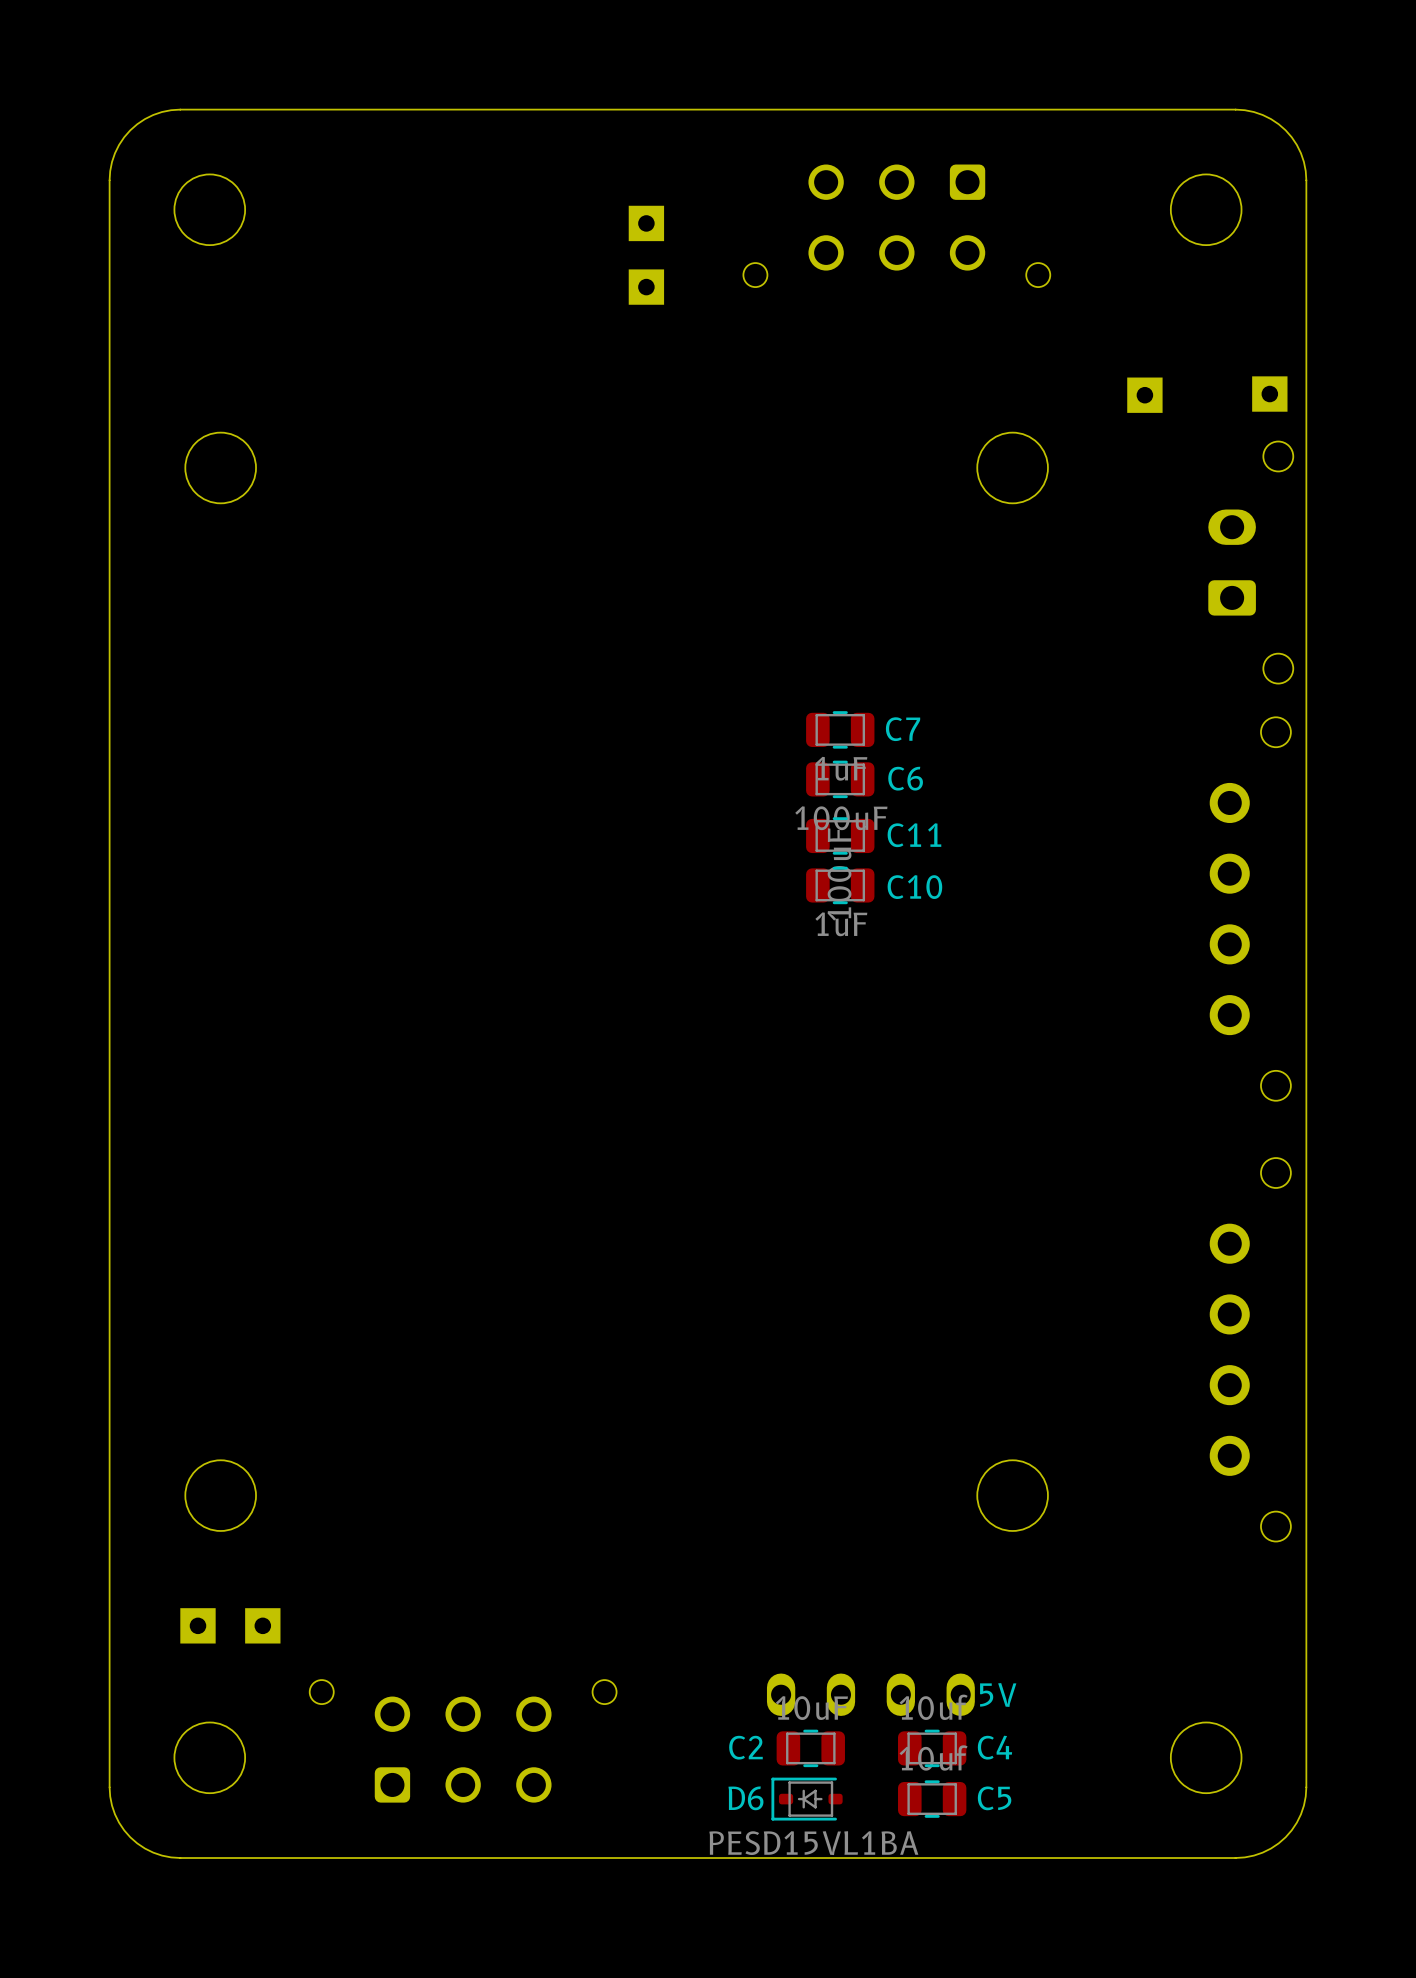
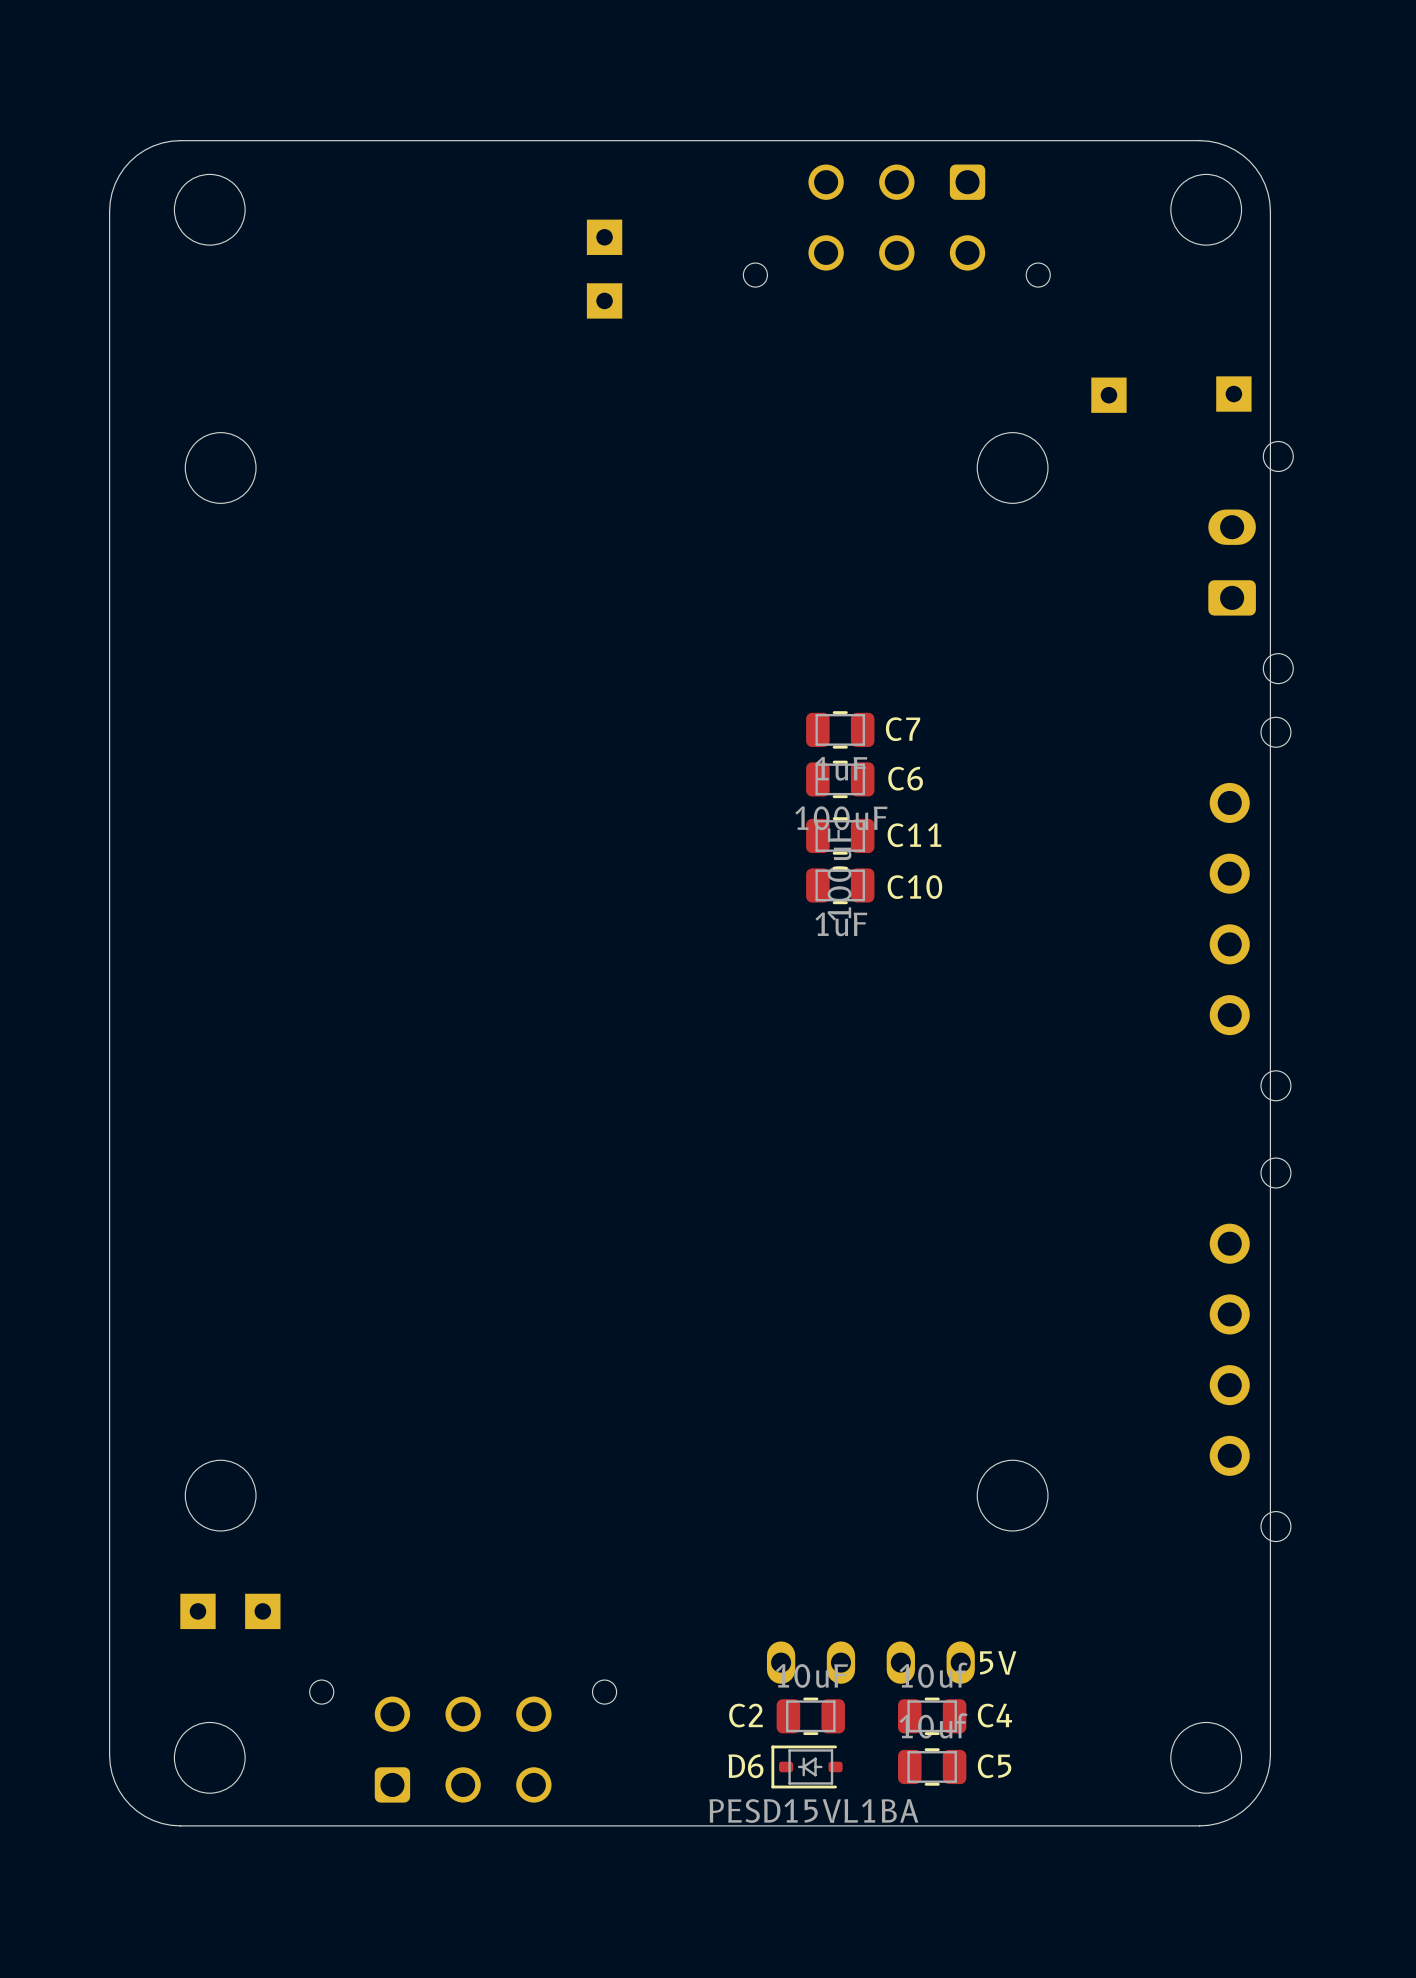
board edge: (109, 211) (110, 171) (114, 153) (124, 137) (137, 124) (153, 114) (180, 109) (1235, 109) (1262, 114) (1278, 124) (1291, 137) (1300, 153) (1306, 180) (1306, 1787) (1300, 1814) (1285, 1837) (1262, 1852) (1235, 1858) (180, 1858) (162, 1855) (144, 1848) (124, 1830) (114, 1814) (110, 1796) (109, 1755) -> (109, 211) (114, 184) (130, 161) (153, 146) (180, 140) (1199, 140) (1226, 146) (1249, 161) (1265, 184) (1270, 211) (1270, 1755) (1268, 1773) (1255, 1798) (1235, 1816) (1218, 1823) (1199, 1825) (180, 1825) (153, 1820) (130, 1805) (114, 1782) (109, 1755)
part: (646, 223) -> none
part: none -> (604, 237)
part: (646, 287) -> none
part: none -> (604, 300)
part position: (1269, 394) -> (1233, 394)
part position: (1144, 395) -> (1108, 395)
part position: (197, 1625) -> (197, 1611)
part position: (262, 1625) -> (262, 1611)
part position: (870, 1694) -> (870, 1662)
text position: 5V (998, 1695) -> 5V (998, 1662)
C2 position: (810, 1748) -> (810, 1716)
C4 position: (932, 1748) -> (932, 1716)
D6 position: (807, 1799) -> (807, 1766)
C5 position: (932, 1799) -> (932, 1766)

